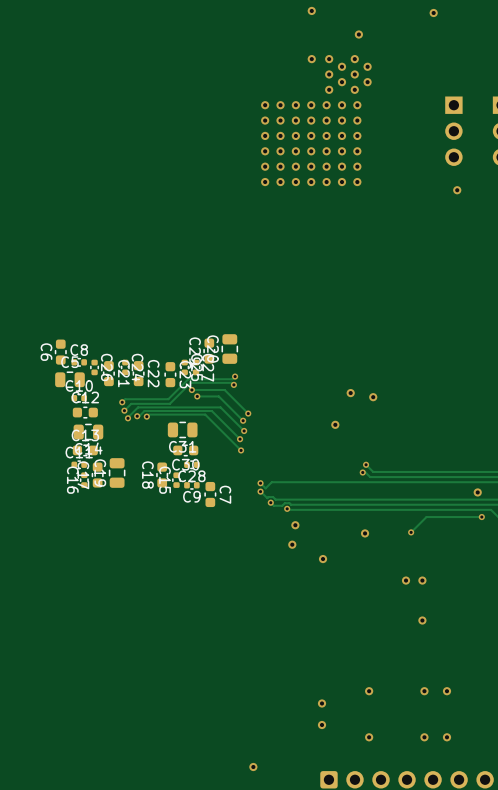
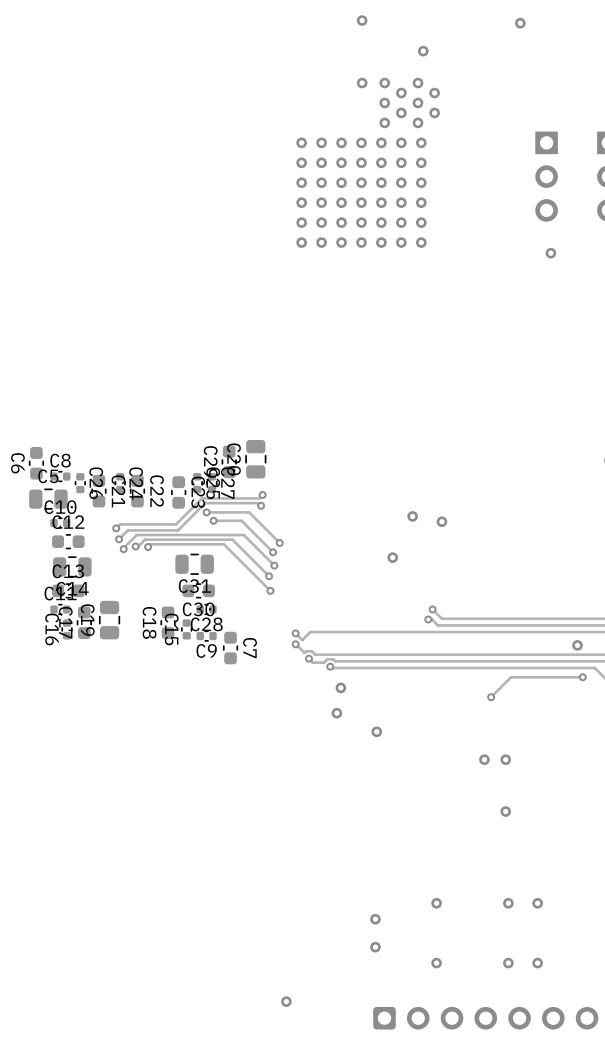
via: (365, 533) -> none

